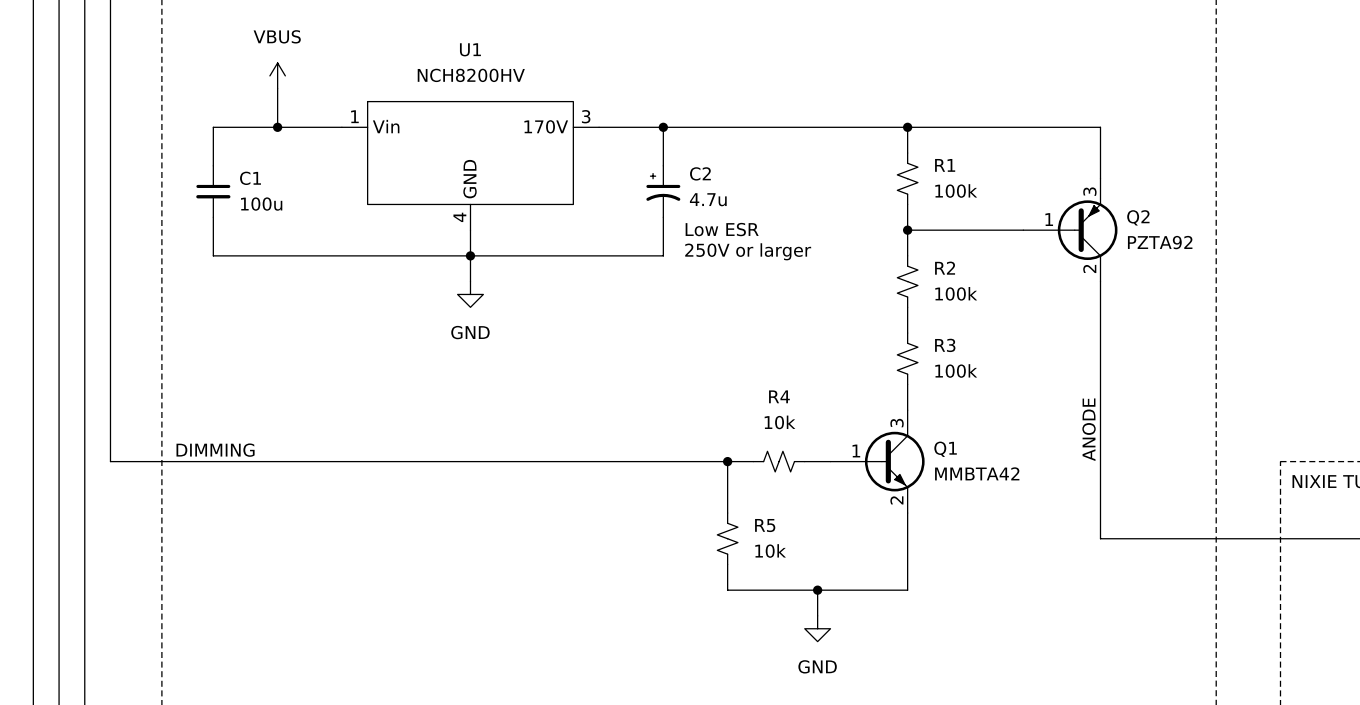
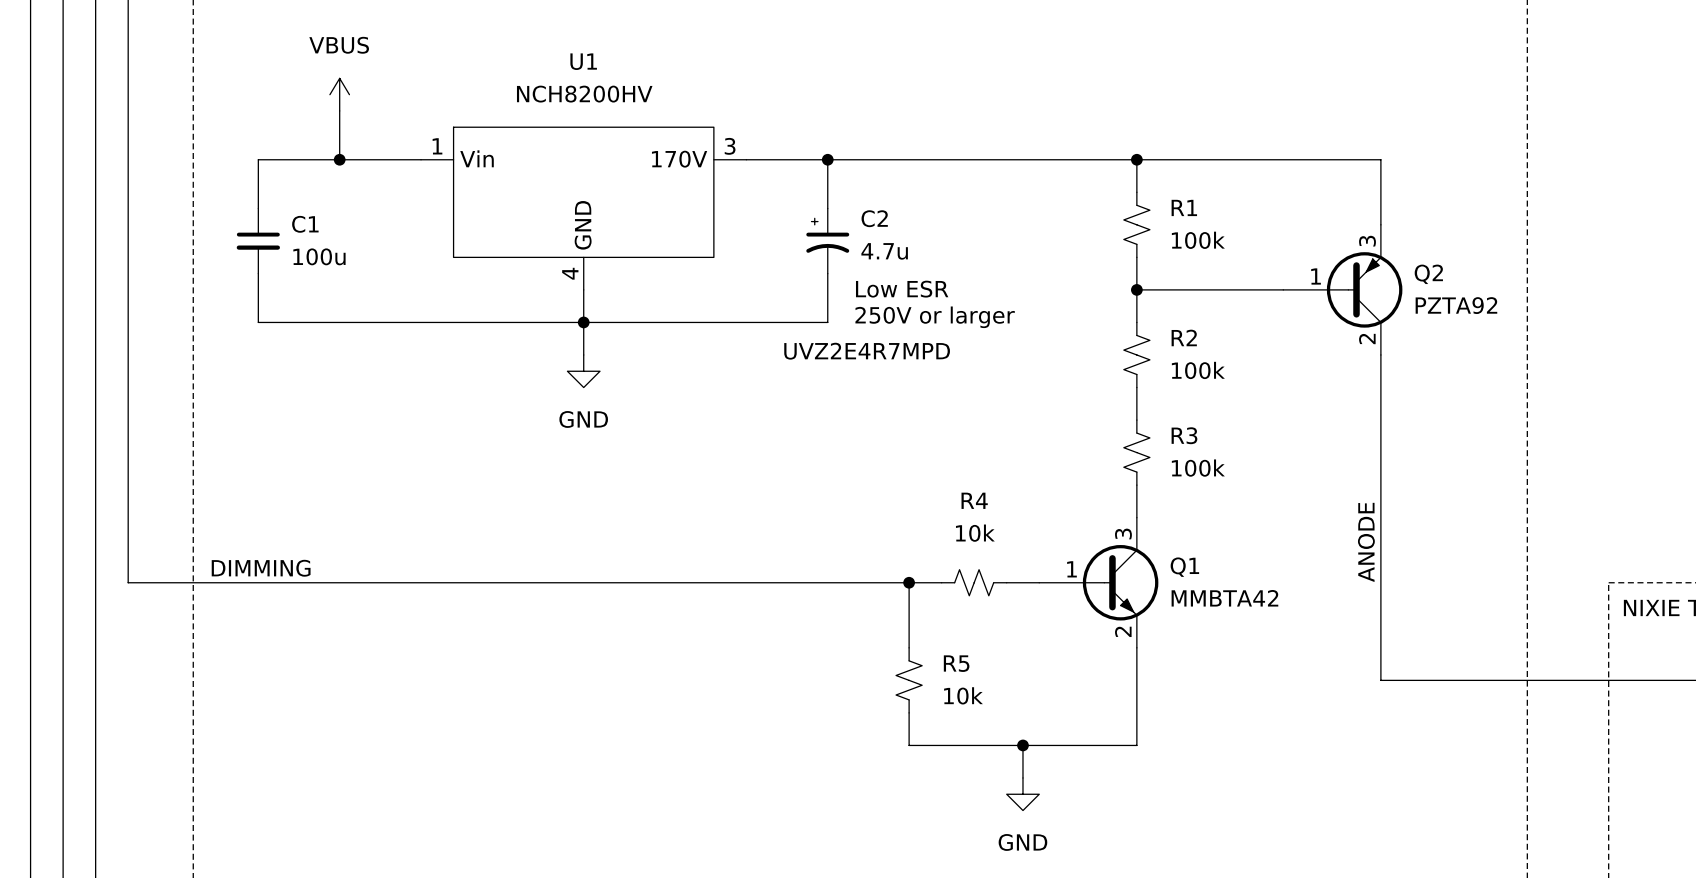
text: none -> UVZ2E4R7MPD (867, 351)

